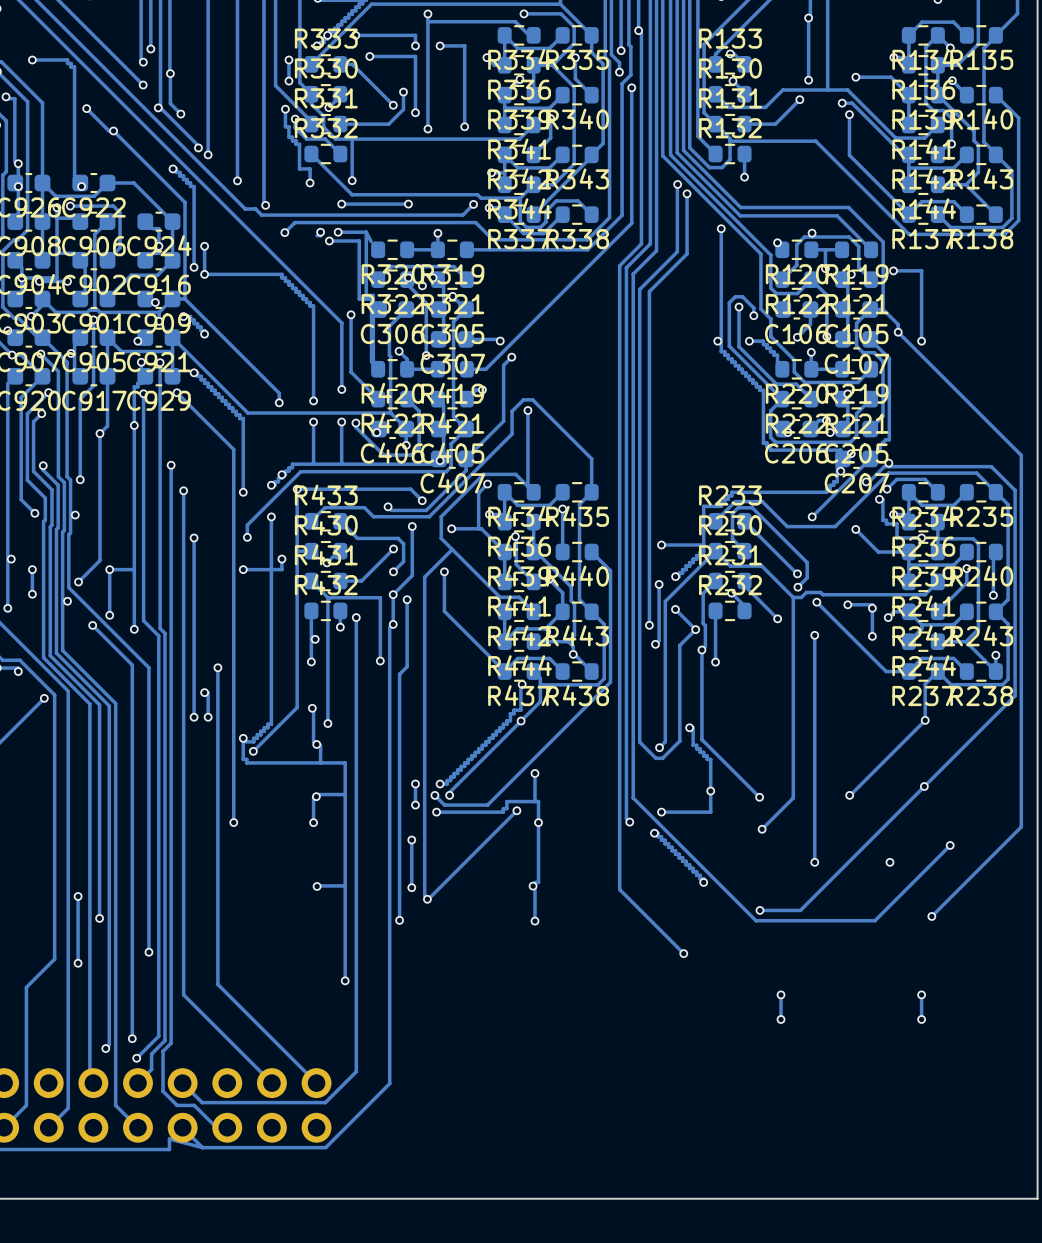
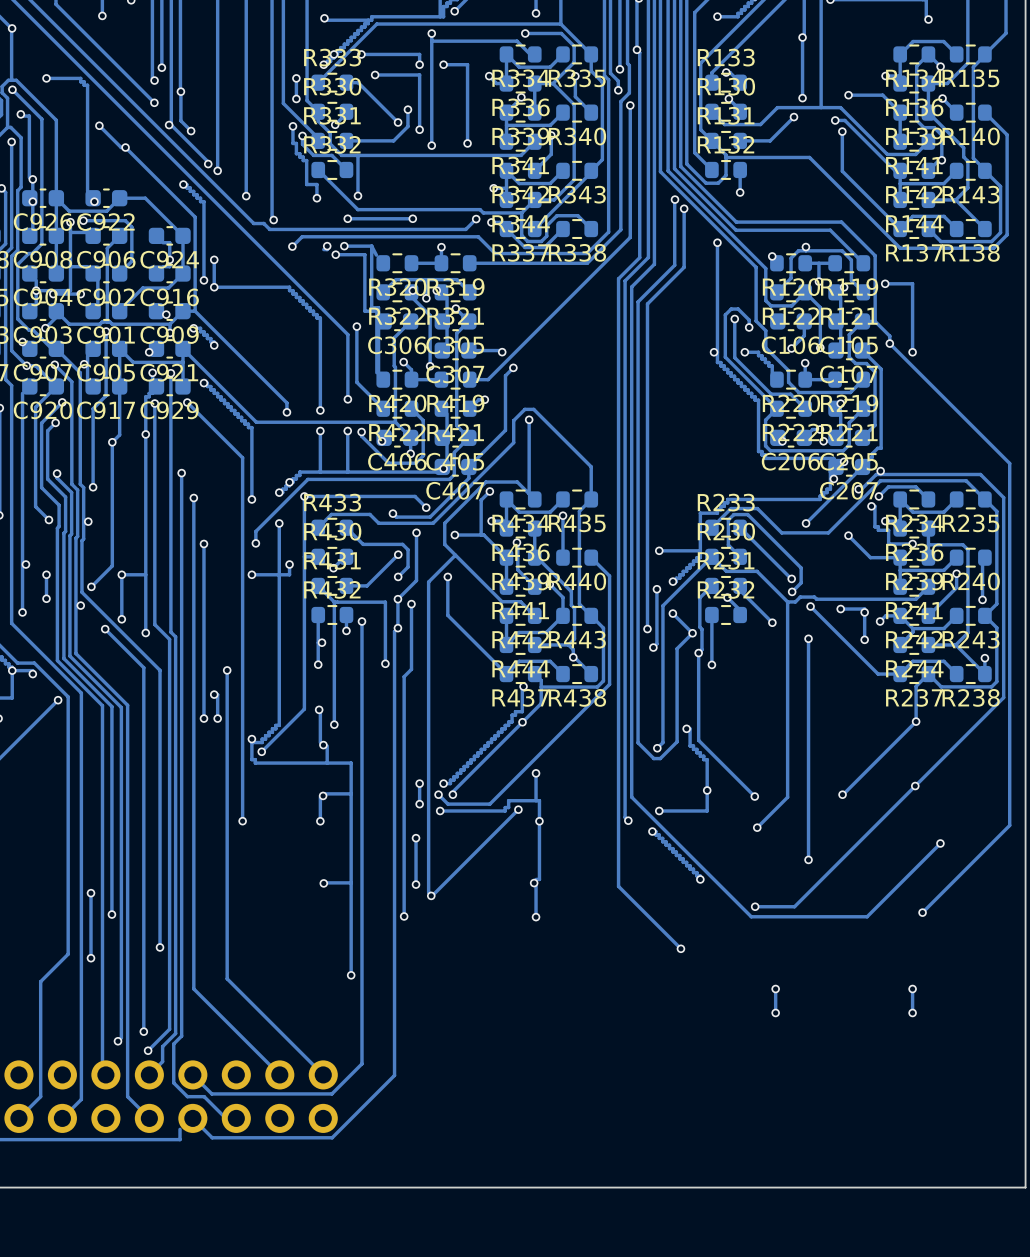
via: (889, 862) -> none
track: (169, 1138) (202, 1147) -> none

